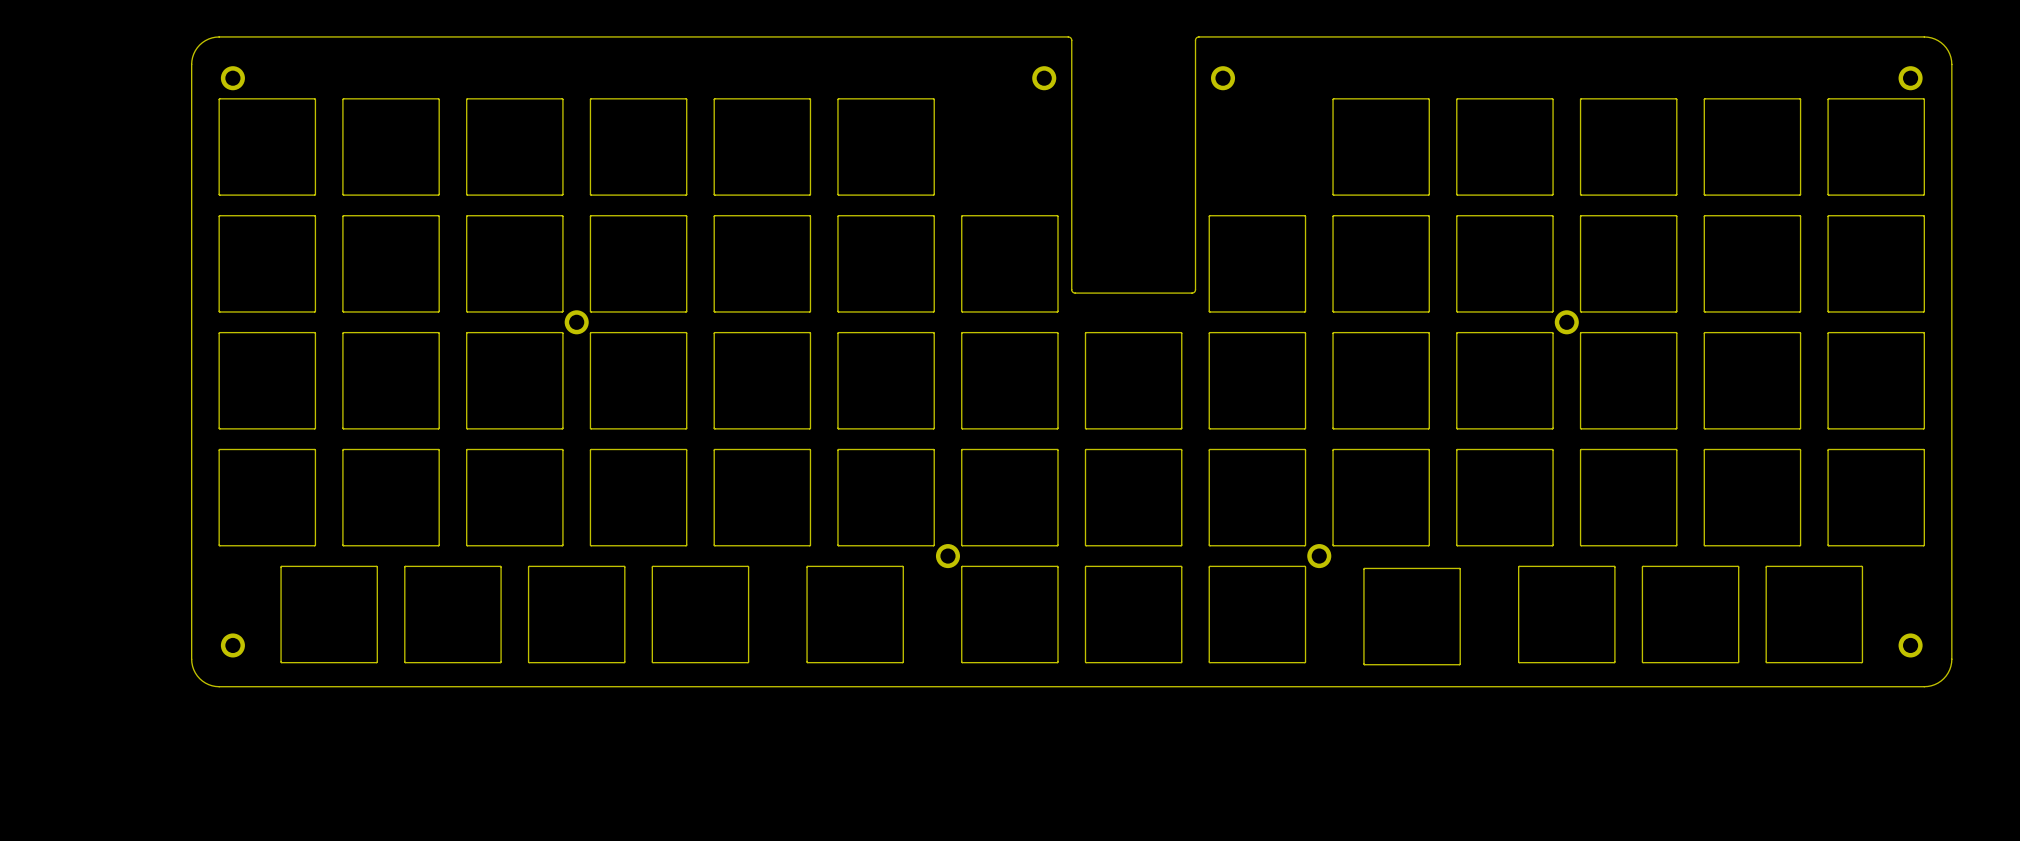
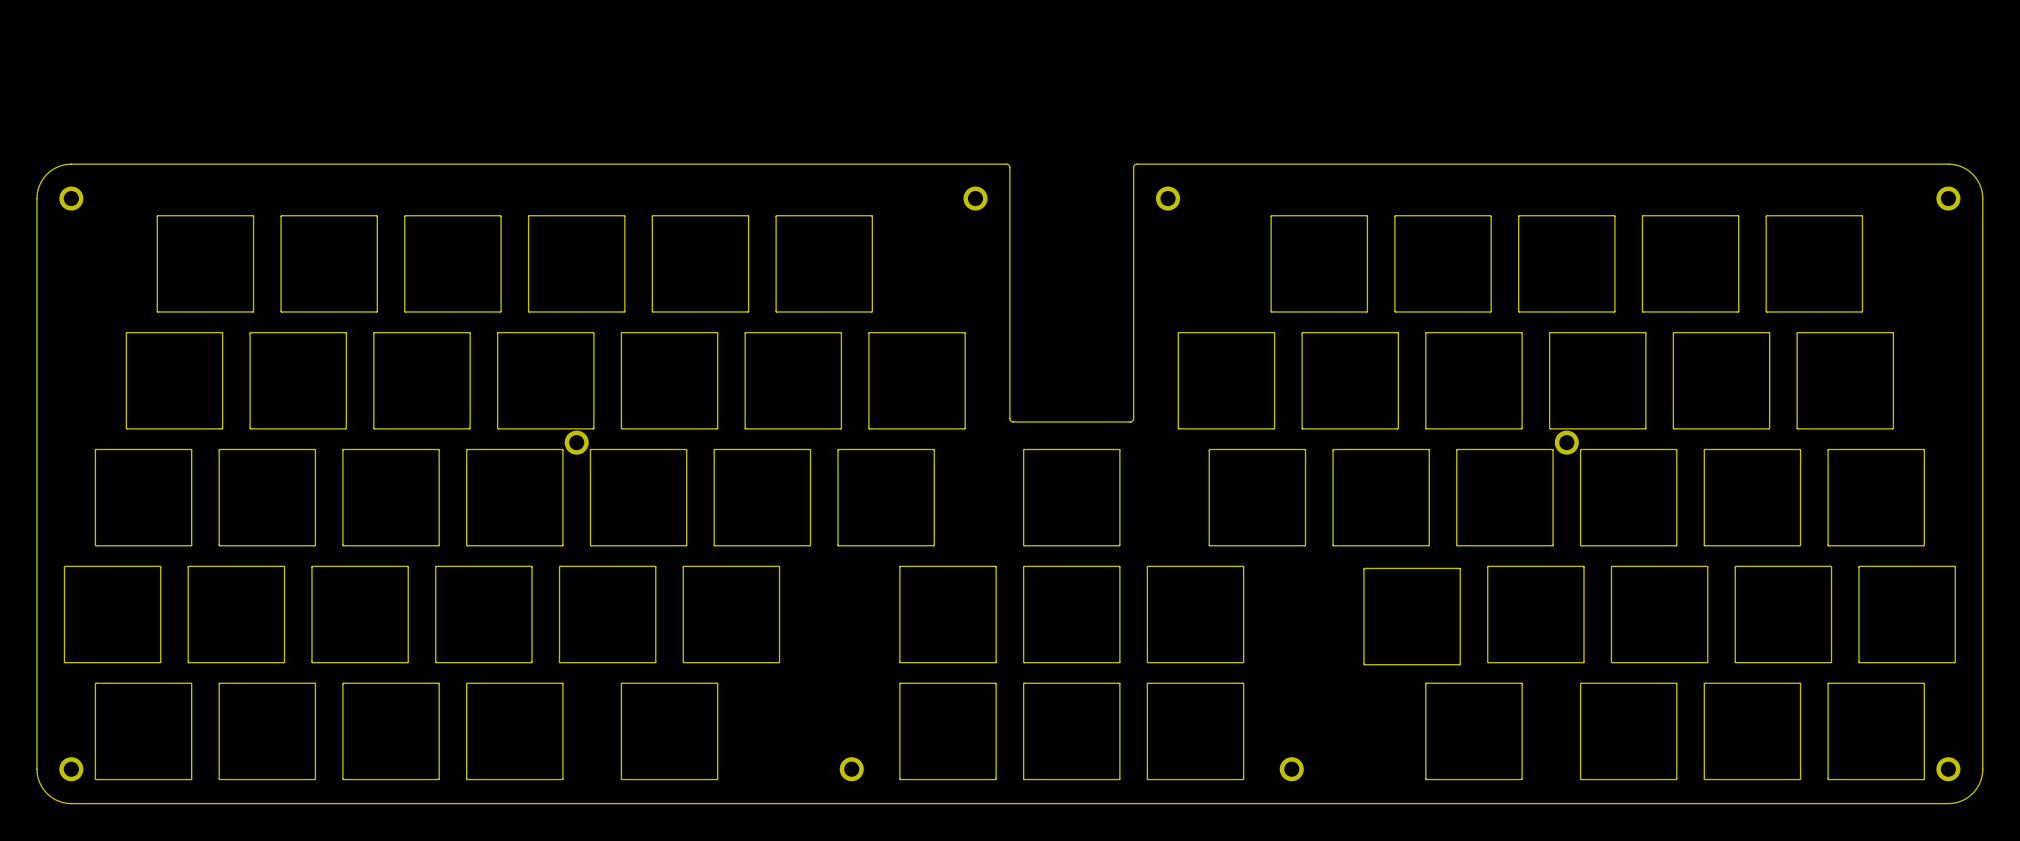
board edge: (1924, 36) (1197, 37) (1195, 40) (1195, 289) (1192, 293) (1075, 293) (1072, 290) (1071, 40) (1069, 37) (219, 36) (208, 39) (195, 50) (191, 64) (191, 659) (193, 669) (202, 681) (219, 686) (1924, 686) (1934, 684) (1946, 675) (1951, 659) (1951, 64) (1949, 53) (1943, 45) (1934, 39) (1924, 36) -> (1948, 164) (1959, 166) (1972, 174) (1980, 187) (1982, 198) (1982, 769) (1980, 780) (1975, 790) (1959, 801) (1948, 803) (71, 803) (59, 801) (49, 796) (38, 780) (36, 769) (36, 198) (38, 187) (44, 177) (59, 166) (71, 164) (1007, 164) (1009, 167) (1010, 419) (1013, 422) (1130, 422) (1133, 418) (1133, 167) (1136, 164) (1948, 164)
part: (232, 78) -> none
part: (1044, 78) -> none
part: (1223, 78) -> none
part position: (1910, 78) -> (1948, 198)
drawing: [218, 98, 316, 196] -> none
drawing: [342, 98, 440, 196] -> none
drawing: [466, 98, 564, 196] -> none
drawing: [590, 98, 687, 196] -> none
drawing: [714, 98, 811, 196] -> none
drawing: [837, 98, 935, 196] -> none
drawing: [1332, 98, 1430, 196] -> none
drawing: [1456, 98, 1554, 196] -> none
drawing: [1580, 98, 1677, 196] -> none
drawing: [1704, 98, 1801, 196] -> none
drawing: [1827, 98, 1925, 196] -> none
part: none -> (71, 198)
part: none -> (975, 198)
part: none -> (1168, 198)
drawing: none -> [157, 215, 254, 313]
drawing: [218, 215, 316, 313] -> none
drawing: none -> [280, 215, 378, 313]
drawing: [342, 215, 440, 313] -> none
drawing: none -> [404, 215, 502, 313]
drawing: [466, 215, 564, 313] -> none
drawing: none -> [528, 215, 626, 313]
drawing: [590, 215, 687, 313] -> none
drawing: none -> [652, 215, 749, 313]
drawing: [714, 215, 811, 313] -> none
drawing: none -> [775, 215, 873, 313]
drawing: [837, 215, 935, 313] -> none
drawing: [961, 215, 1059, 313] -> none
drawing: [1209, 215, 1306, 313] -> none
drawing: none -> [1270, 215, 1368, 313]
drawing: [1332, 215, 1430, 313] -> none
drawing: none -> [1394, 215, 1492, 313]
drawing: [1456, 215, 1554, 313] -> none
drawing: none -> [1518, 215, 1616, 313]
drawing: [1580, 215, 1677, 313] -> none
drawing: none -> [1642, 215, 1739, 313]
drawing: [1704, 215, 1801, 313] -> none
drawing: none -> [1766, 215, 1863, 313]
drawing: [1827, 215, 1925, 313] -> none
part position: (576, 322) -> (576, 442)
part position: (1566, 322) -> (1566, 442)
drawing: none -> [126, 332, 223, 430]
drawing: [961, 332, 1059, 430] -> none
drawing: [1085, 332, 1182, 430] -> none
drawing position: (267, 380) -> (298, 380)
drawing position: (391, 380) -> (422, 380)
drawing position: (514, 380) -> (545, 380)
drawing position: (638, 380) -> (669, 380)
drawing position: (762, 380) -> (793, 380)
drawing position: (886, 380) -> (917, 380)
drawing position: (1257, 380) -> (1226, 380)
drawing position: (1381, 380) -> (1350, 380)
drawing position: (1504, 380) -> (1473, 380)
drawing position: (1628, 380) -> (1597, 380)
drawing position: (1752, 380) -> (1721, 380)
drawing position: (1876, 380) -> (1845, 380)
drawing: none -> [95, 449, 192, 546]
drawing: [961, 449, 1059, 546] -> none
drawing: none -> [1023, 449, 1121, 546]
drawing: [1085, 449, 1182, 546] -> none
part: (947, 556) -> none
part: (1319, 556) -> none
drawing: none -> [64, 566, 161, 663]
drawing: none -> [188, 566, 285, 663]
drawing: [806, 566, 904, 663] -> none
drawing: none -> [899, 566, 997, 663]
drawing: [961, 566, 1059, 663] -> none
drawing: none -> [1023, 566, 1121, 663]
drawing: [1085, 566, 1182, 663] -> none
drawing: none -> [1147, 566, 1244, 663]
drawing: [1209, 566, 1306, 663] -> none
drawing: none -> [1858, 566, 1956, 663]
drawing position: (329, 614) -> (360, 614)
drawing position: (452, 614) -> (483, 614)
drawing position: (576, 614) -> (607, 614)
drawing position: (700, 614) -> (731, 614)
drawing position: (1566, 614) -> (1535, 614)
drawing position: (1690, 614) -> (1659, 614)
drawing position: (1814, 614) -> (1783, 614)
part: (232, 645) -> none
part position: (1910, 645) -> (1948, 769)
drawing: none -> [95, 683, 192, 780]
drawing: none -> [218, 683, 316, 780]
drawing: none -> [342, 683, 440, 780]
drawing: none -> [466, 683, 564, 780]
drawing: none -> [621, 683, 718, 780]
drawing: none -> [899, 683, 997, 780]
drawing: none -> [1023, 683, 1121, 780]
drawing: none -> [1147, 683, 1244, 780]
drawing: none -> [1425, 683, 1523, 780]
drawing: none -> [1580, 683, 1677, 780]
drawing: none -> [1704, 683, 1801, 780]
drawing: none -> [1827, 683, 1925, 780]
part: none -> (71, 769)
part: none -> (851, 769)
part: none -> (1291, 769)

